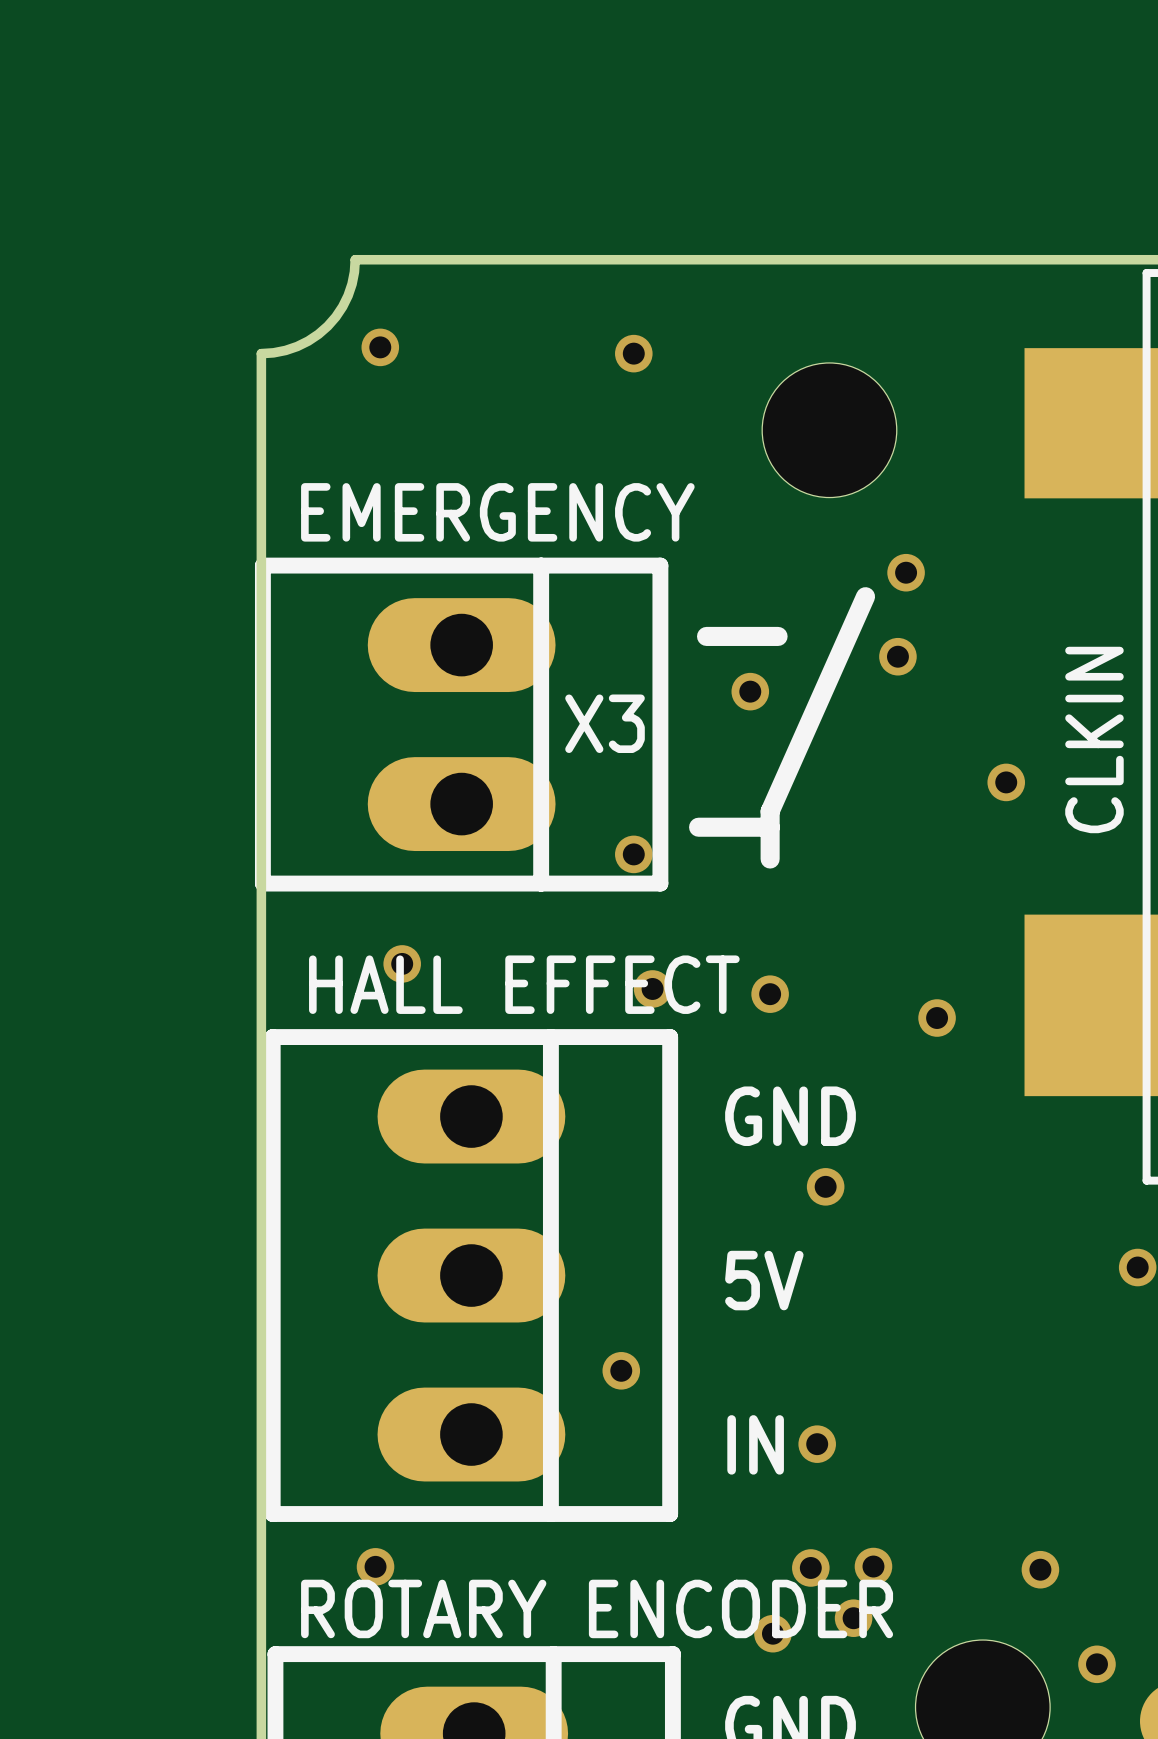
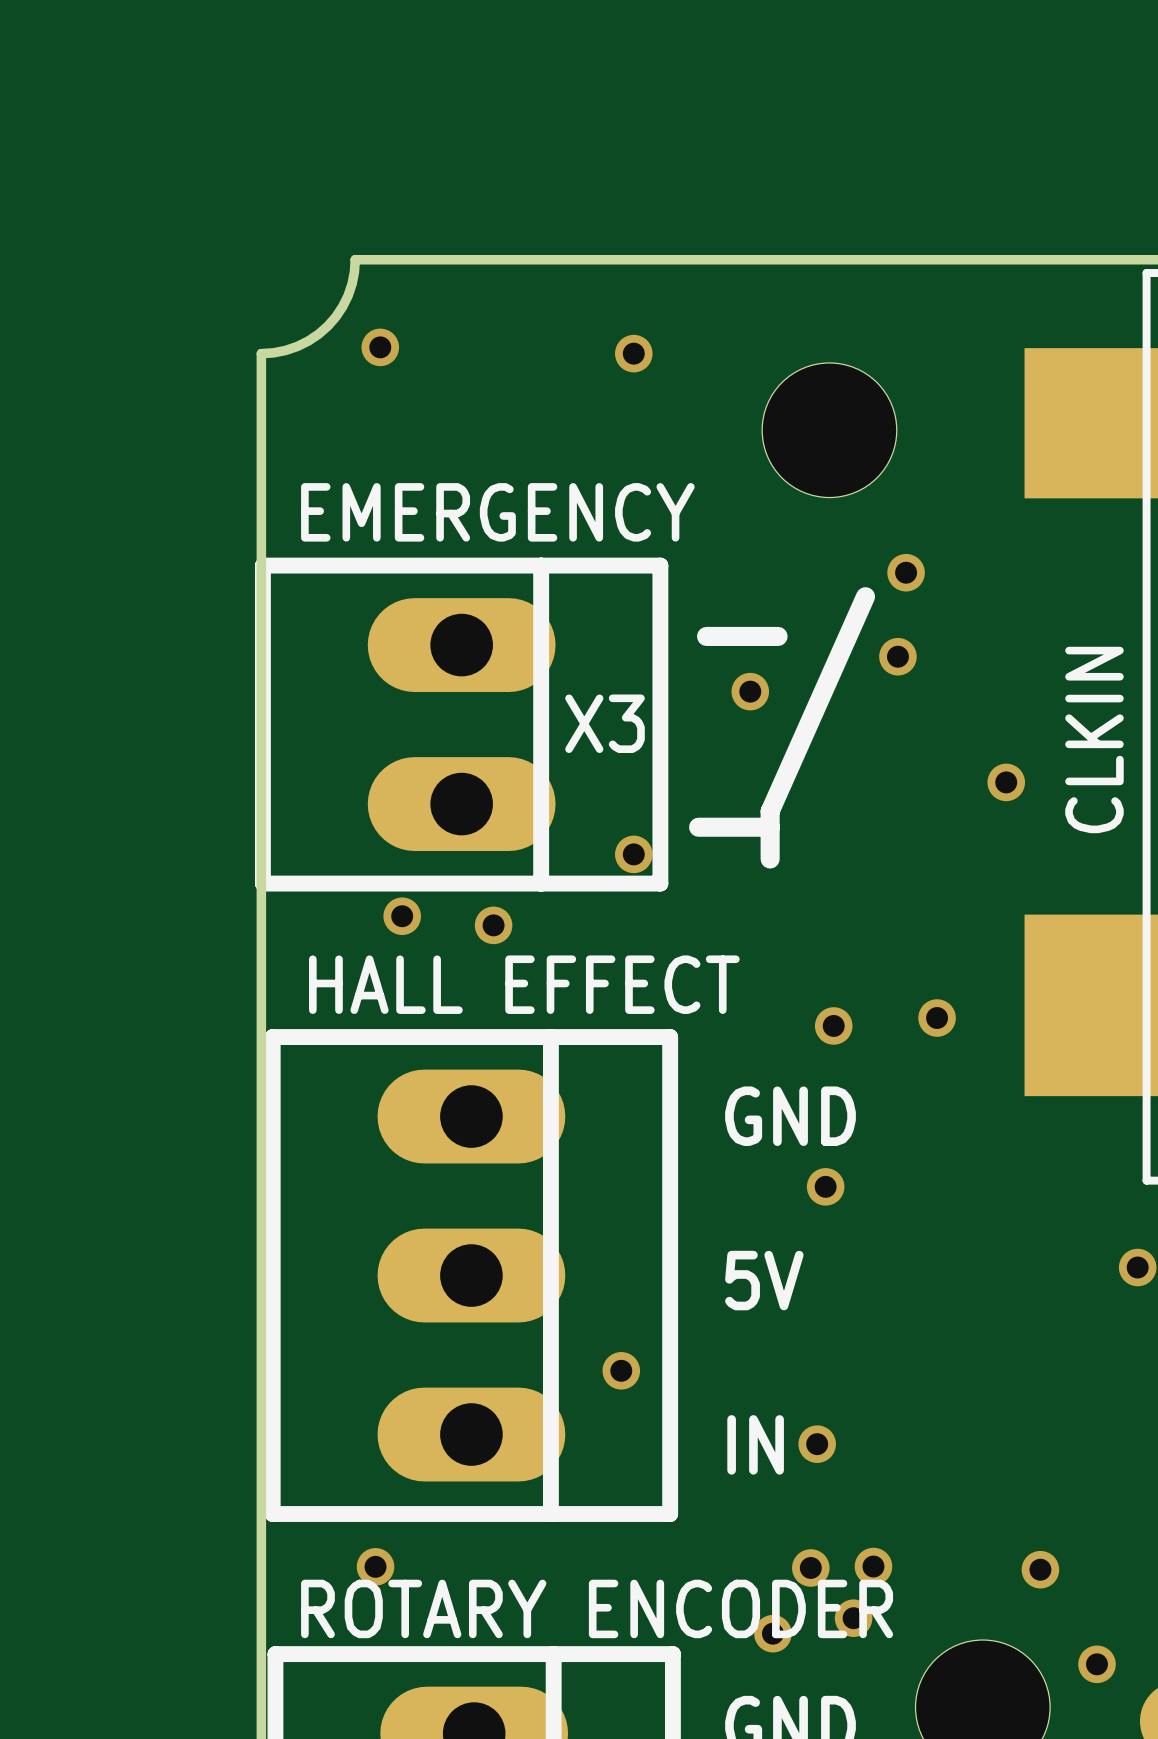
via: none -> (493, 925)
via position: (402, 963) -> (402, 916)
via: (652, 988) -> none
via position: (770, 994) -> (833, 1025)

